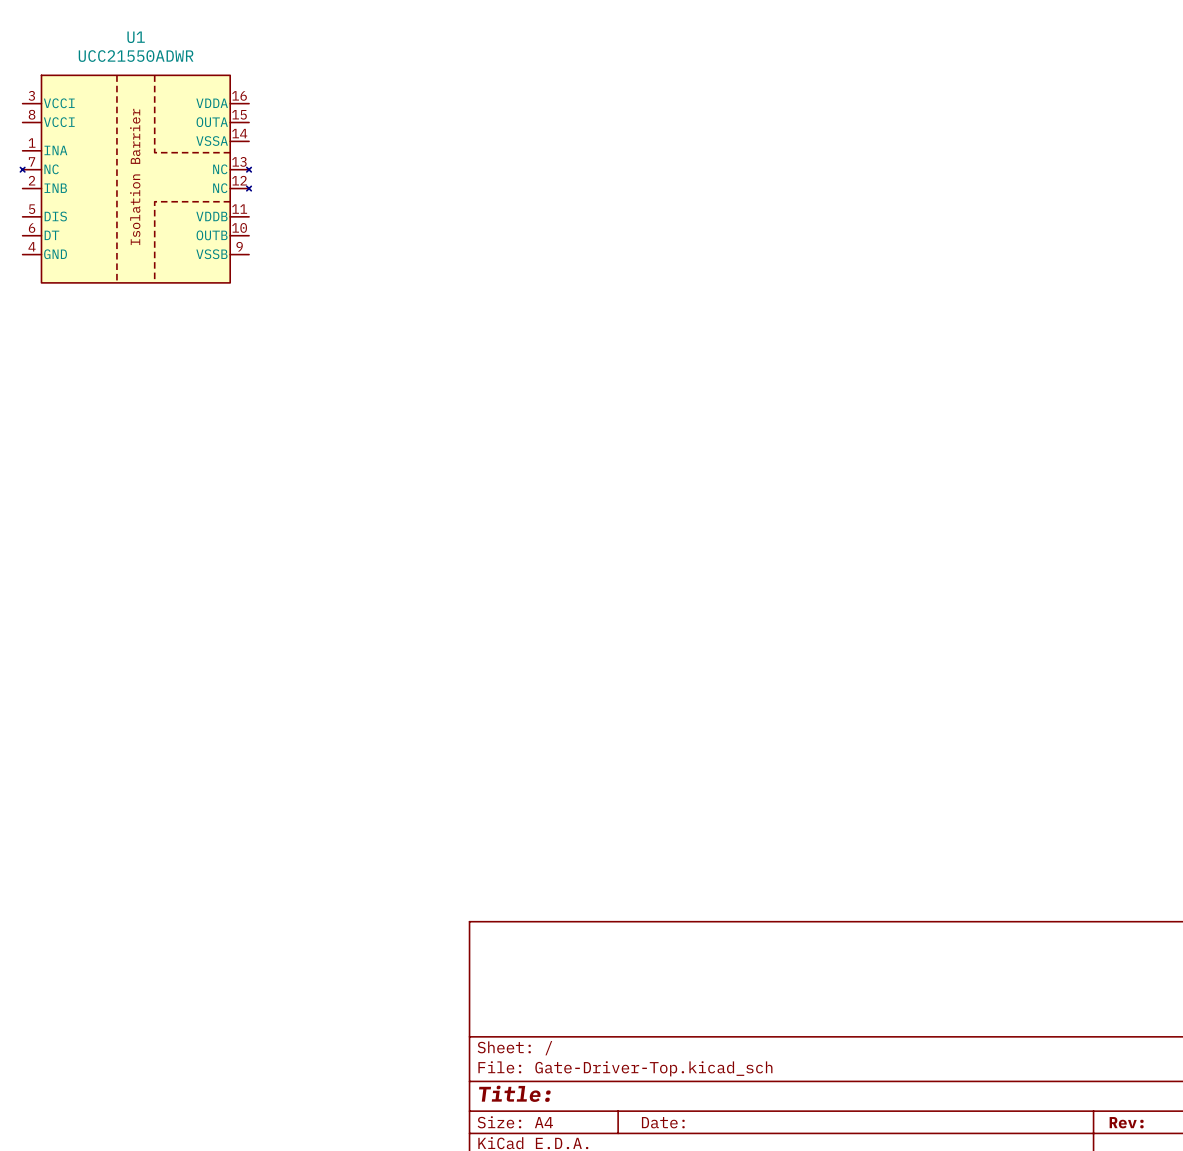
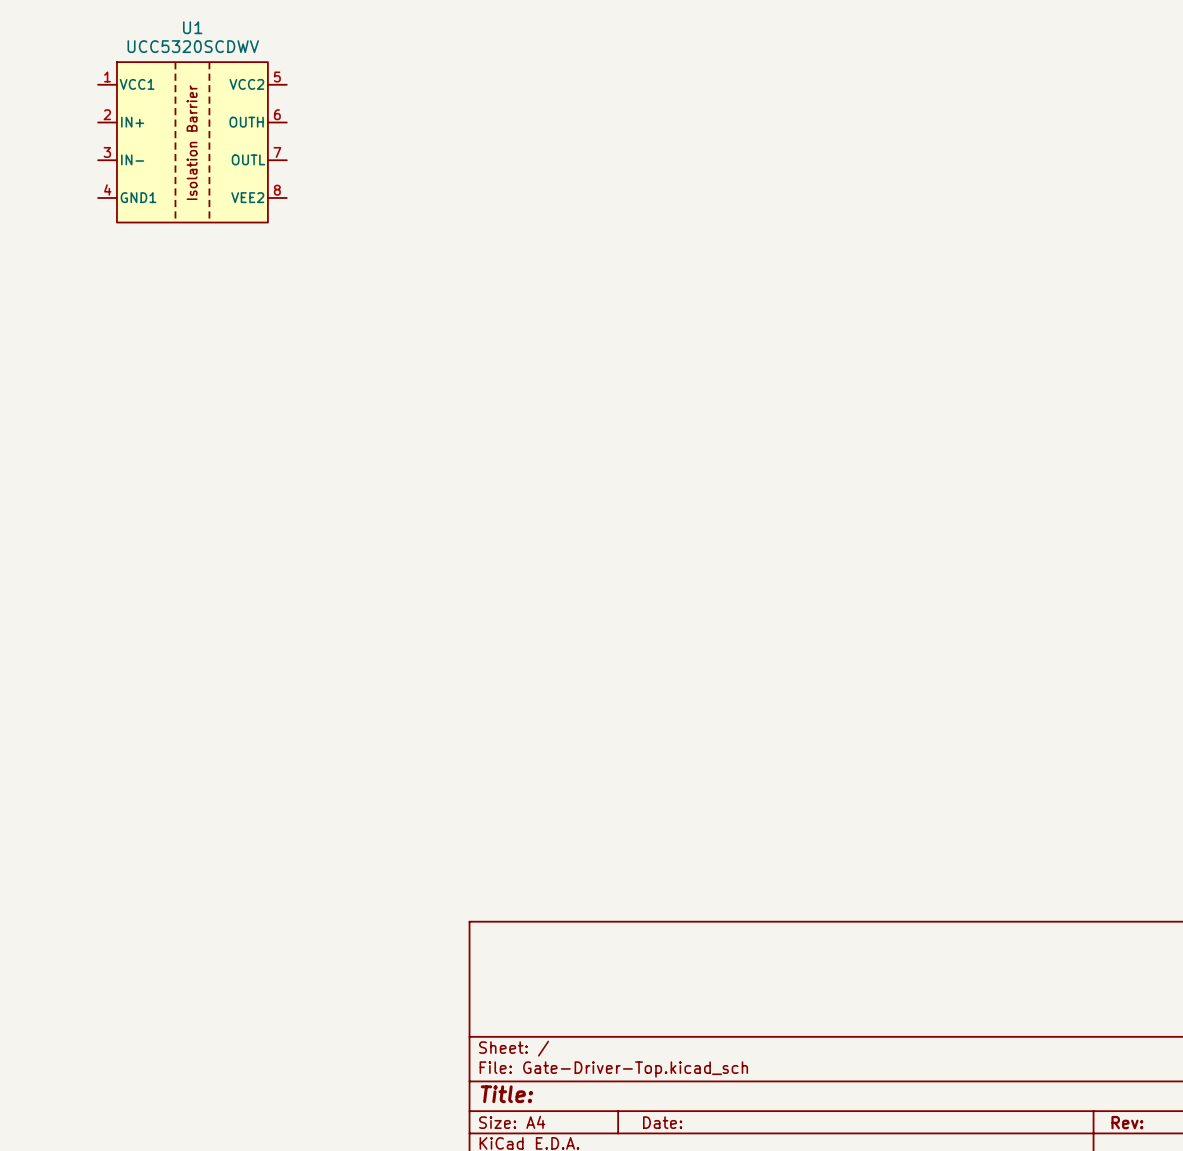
U1 name position: U1 (136, 37) -> U1 (192, 27)
U1 value: UCC21550ADWR (136, 56) -> UCC5320SCDWV (193, 46)
U1 symbol: [20, 75, 252, 283] -> [98, 62, 287, 223]

